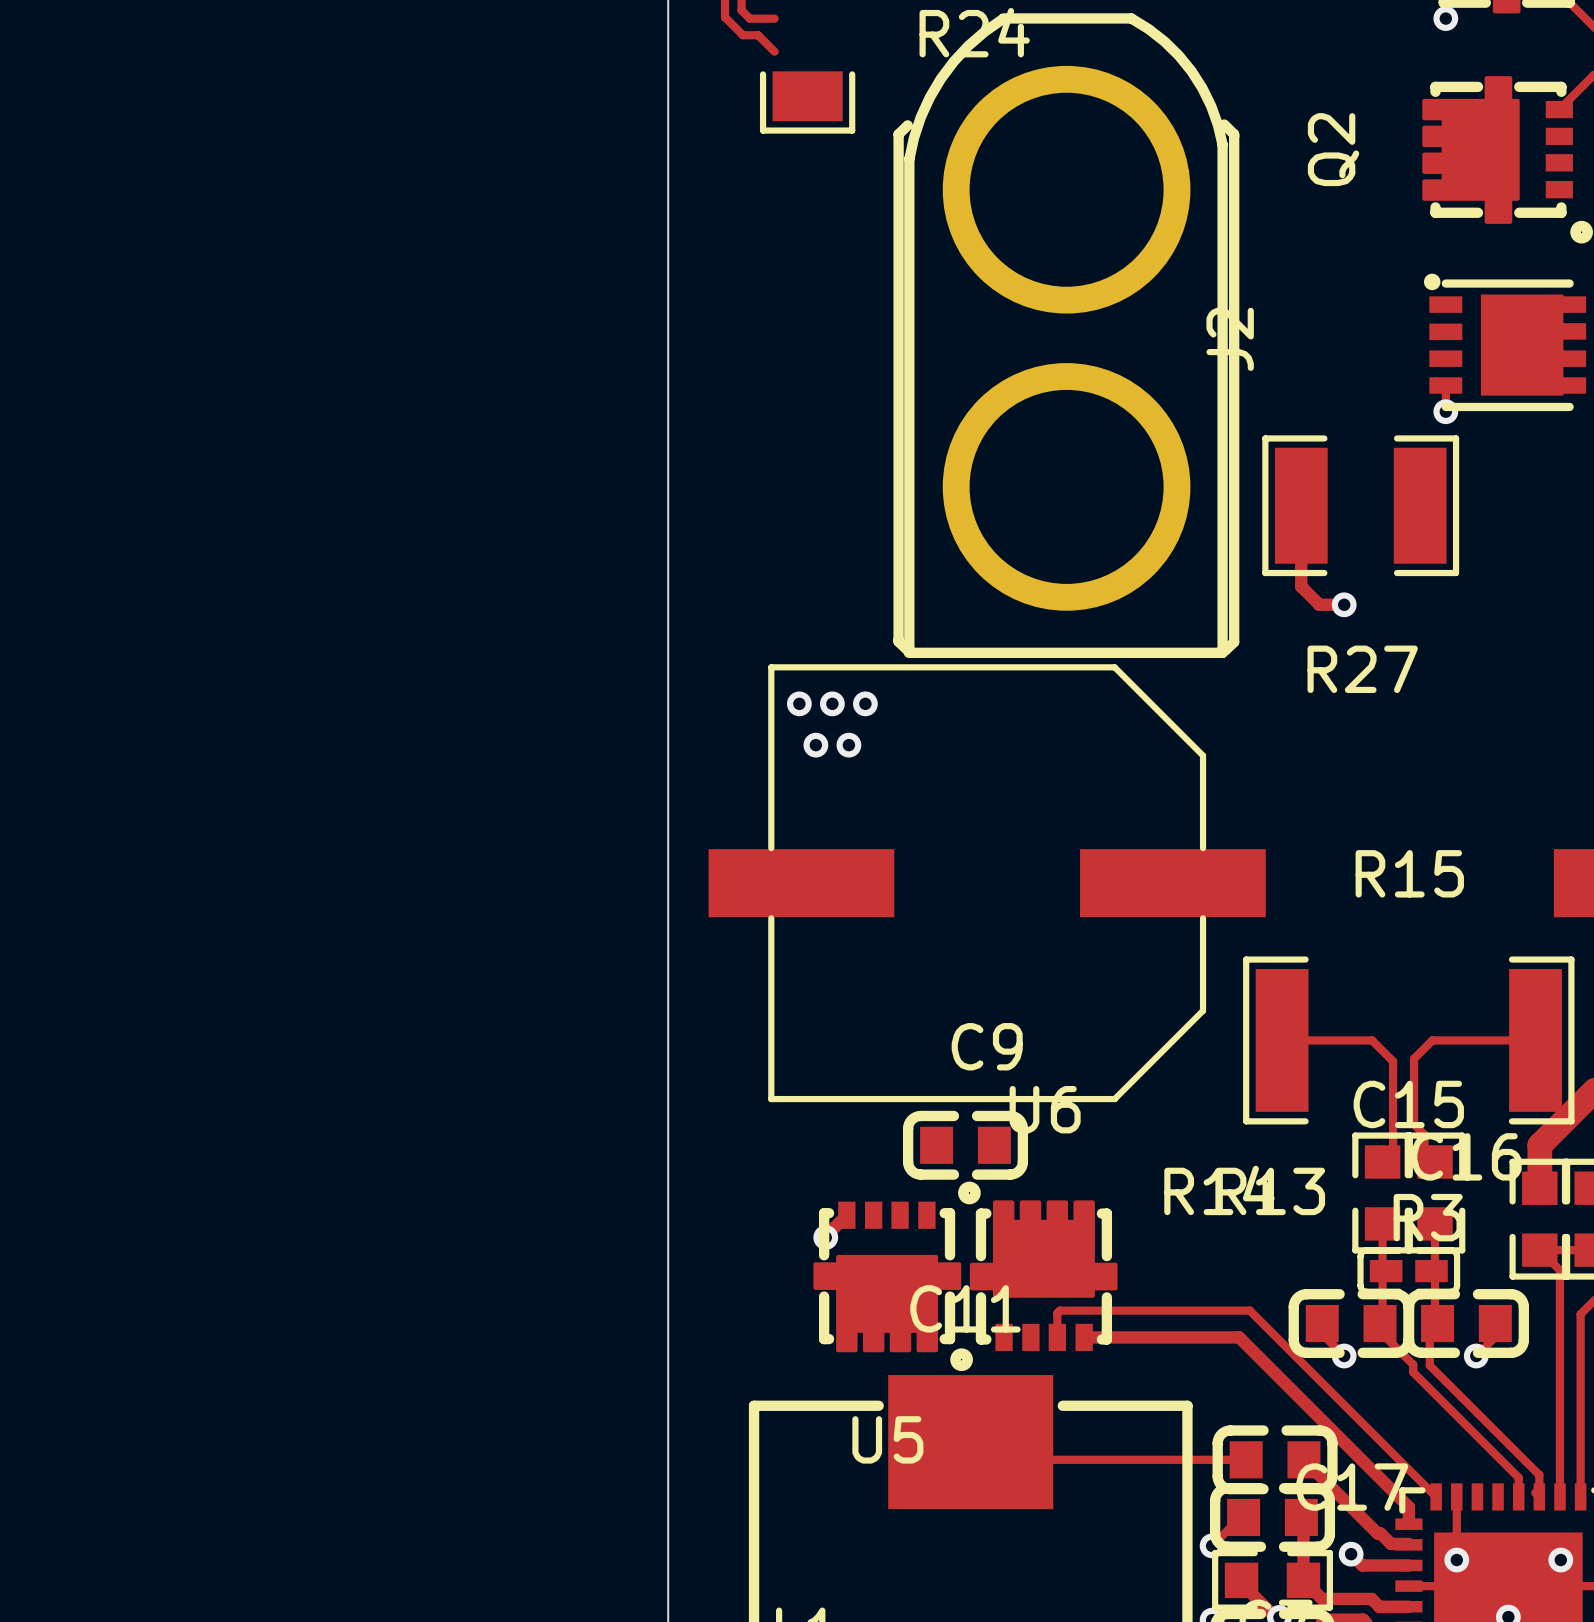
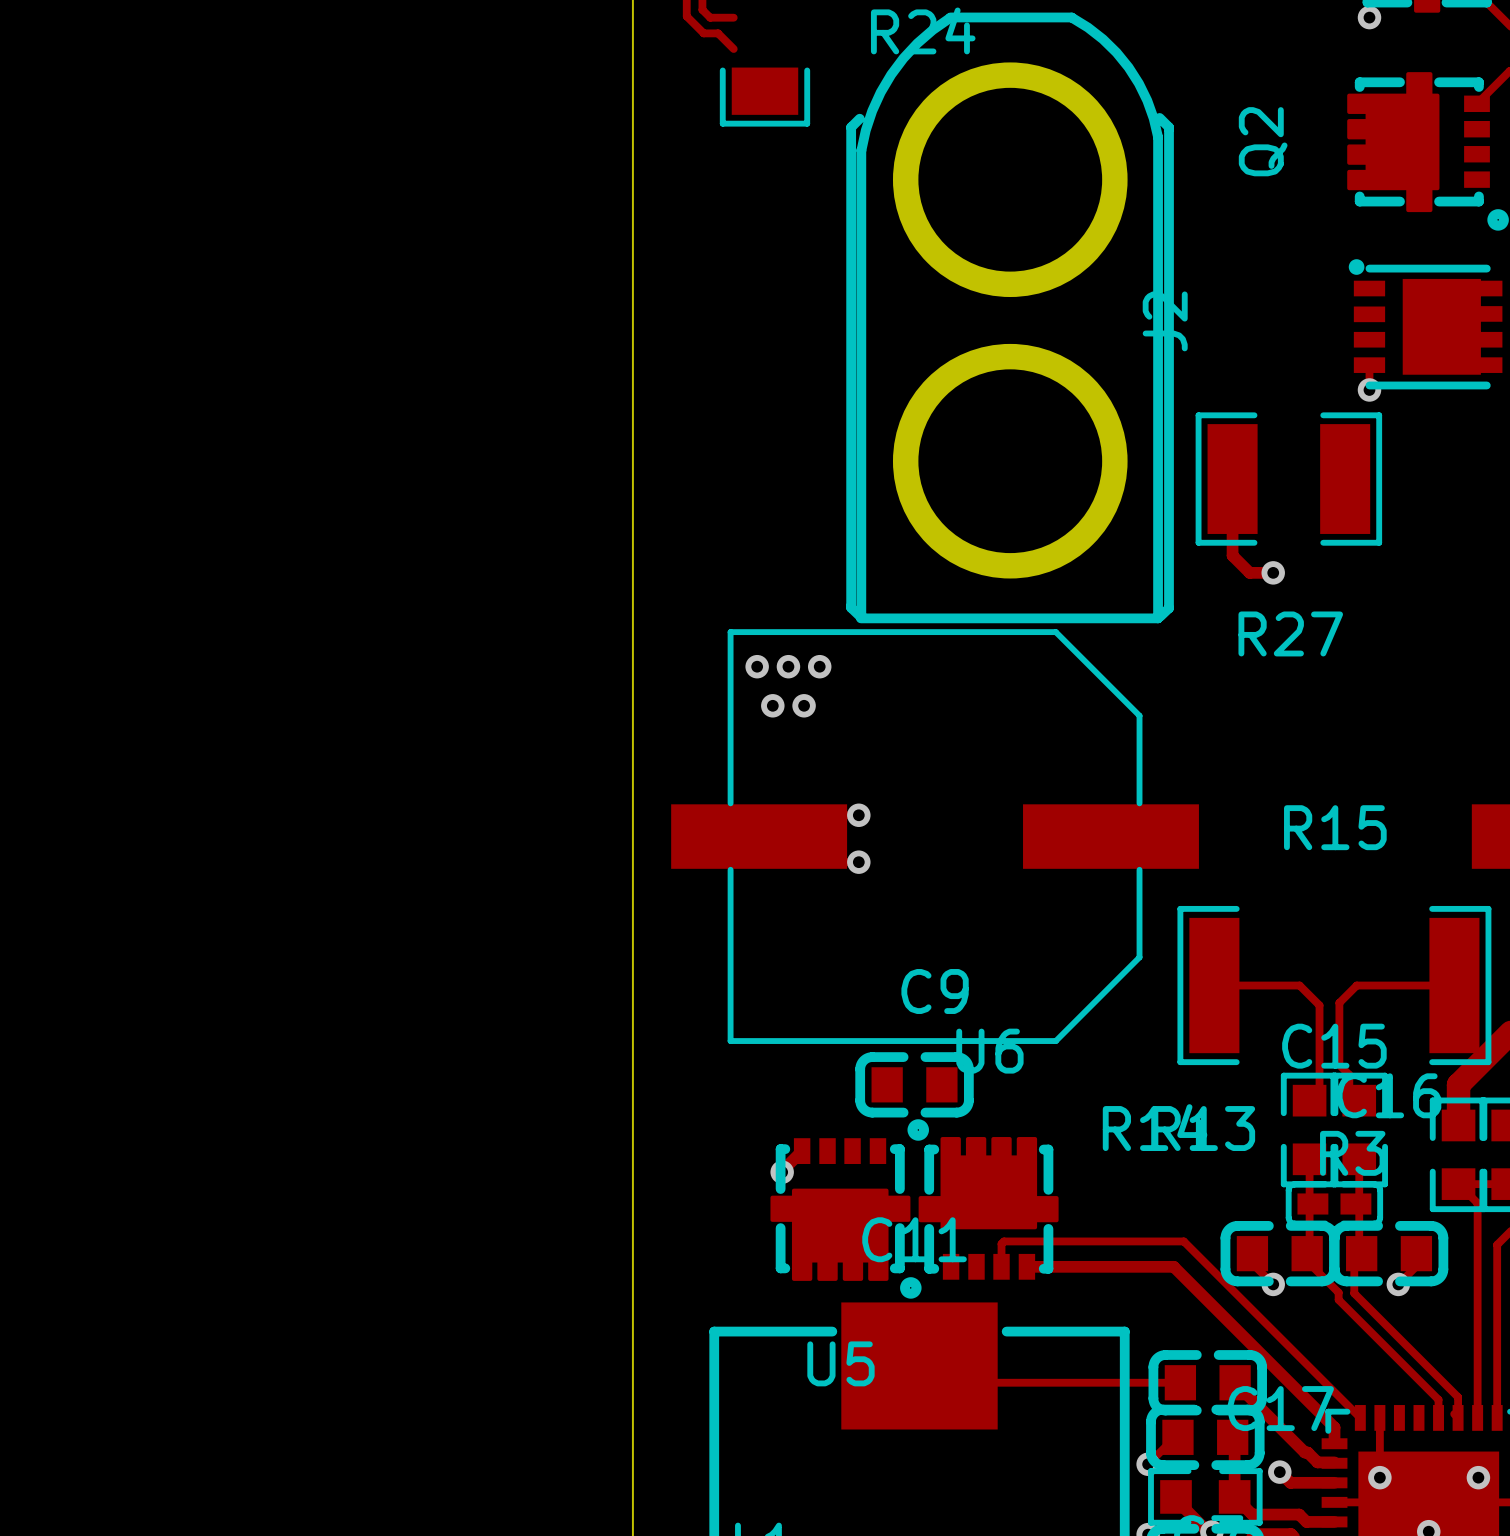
via: none -> (858, 815)
via: none -> (858, 862)

